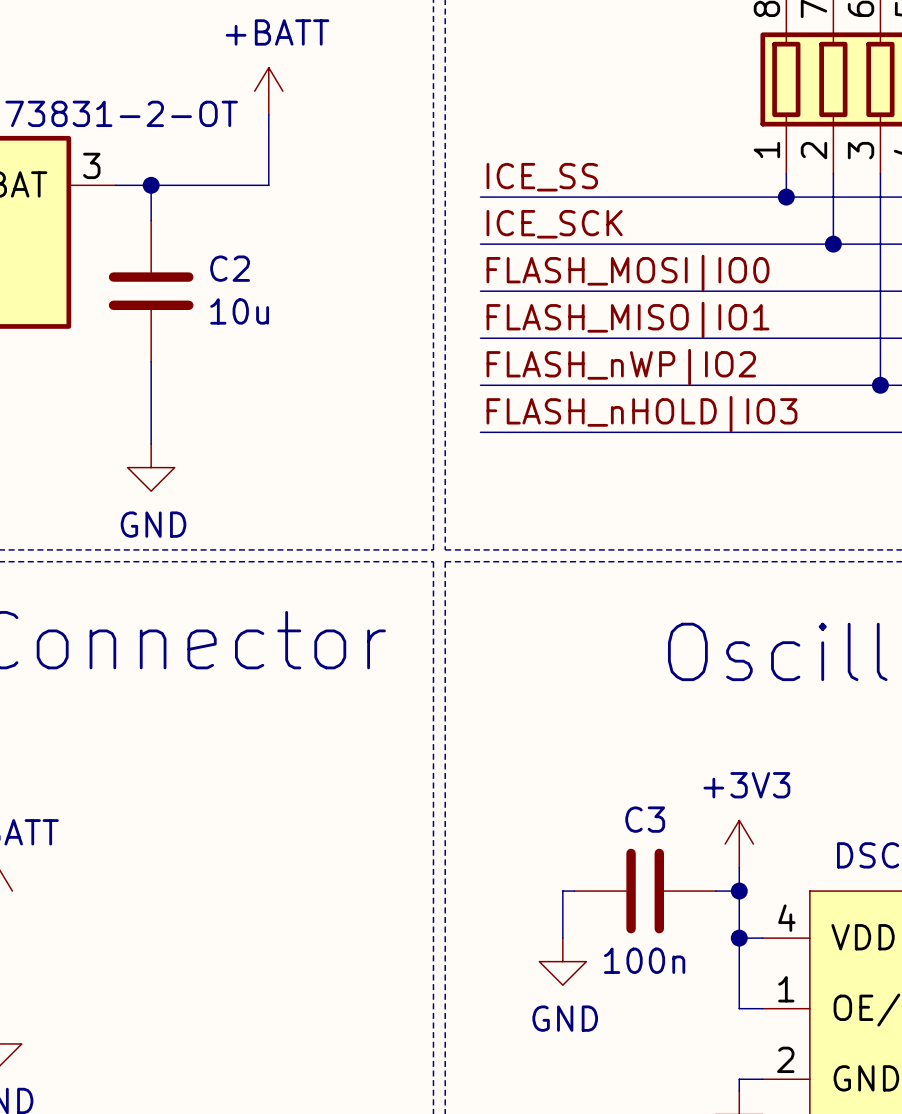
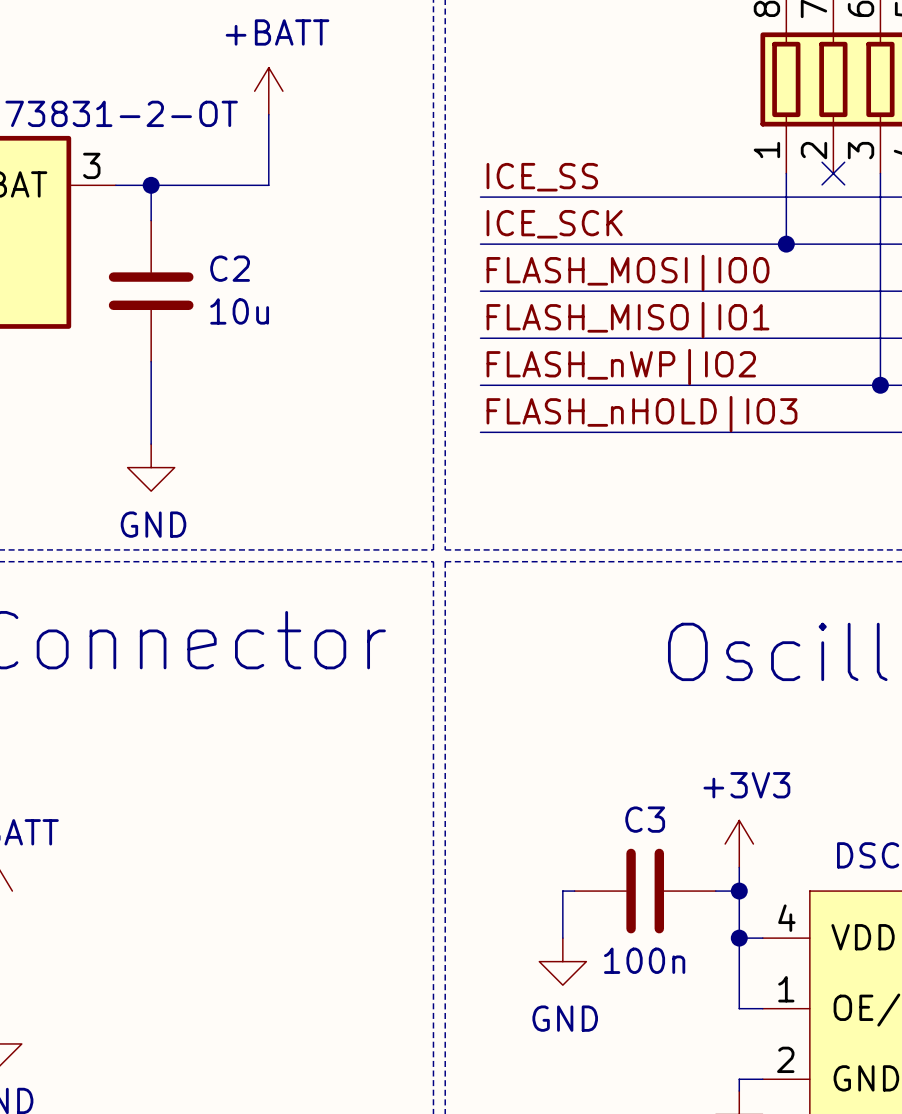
wire: (833, 173) (833, 244) -> none
no-connect mark: none -> (833, 173)
wire: none -> (786, 197) (786, 244)
junction: (786, 197) -> none
junction: none -> (786, 244)
junction: (833, 244) -> none

